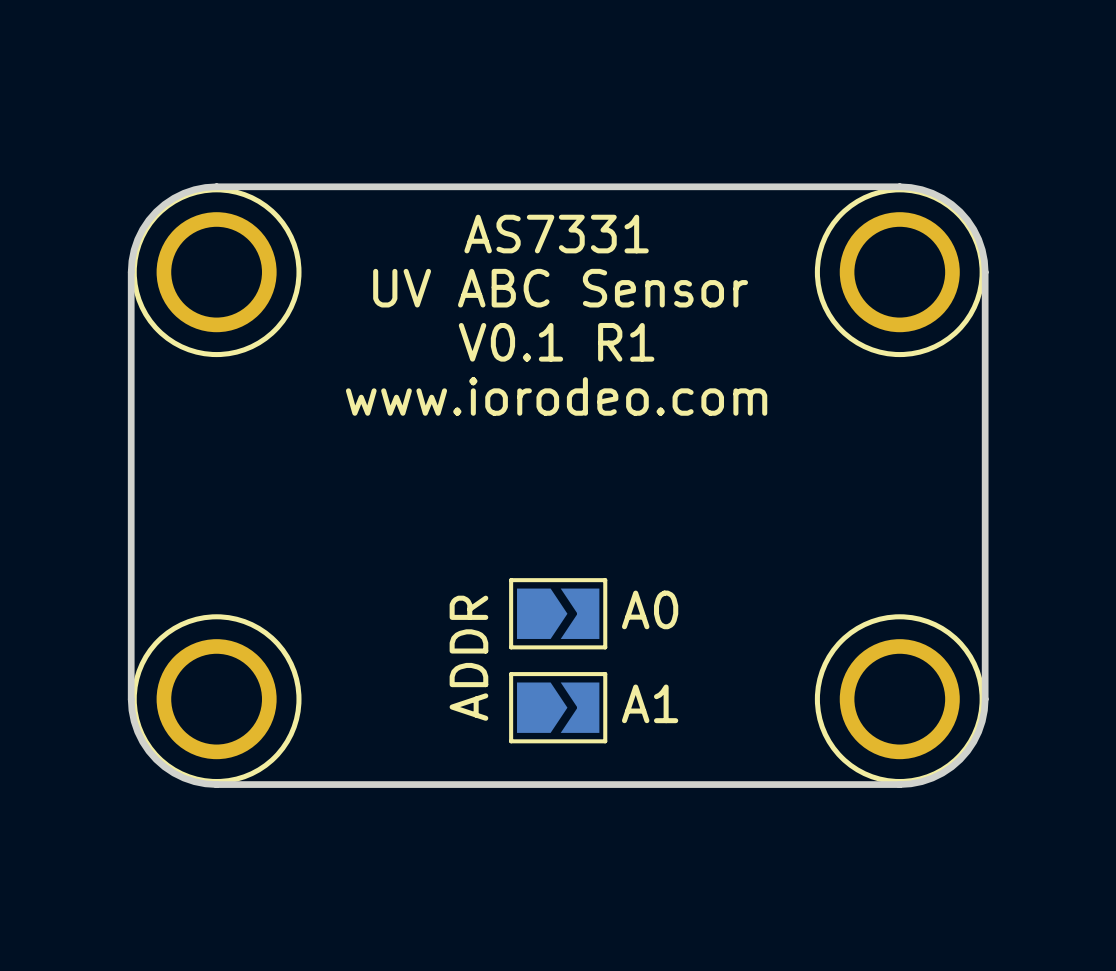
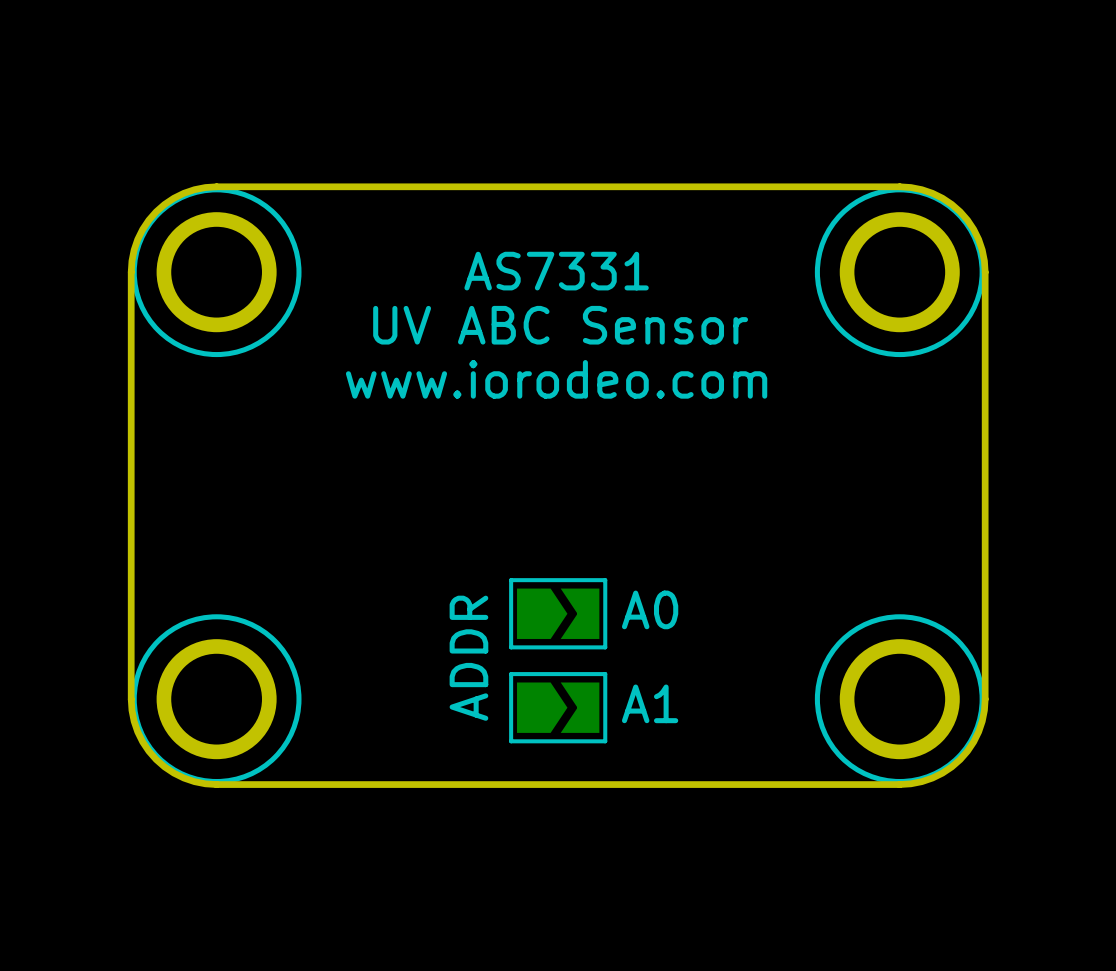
text position: AS7331 (556, 234) -> AS7331 (556, 271)
text position: UV ABC Sensor (560, 288) -> UV ABC Sensor (560, 325)
text: V0.1 R1 (556, 342) -> none
text position: www.iorodeo.com (556, 396) -> www.iorodeo.com (556, 379)

